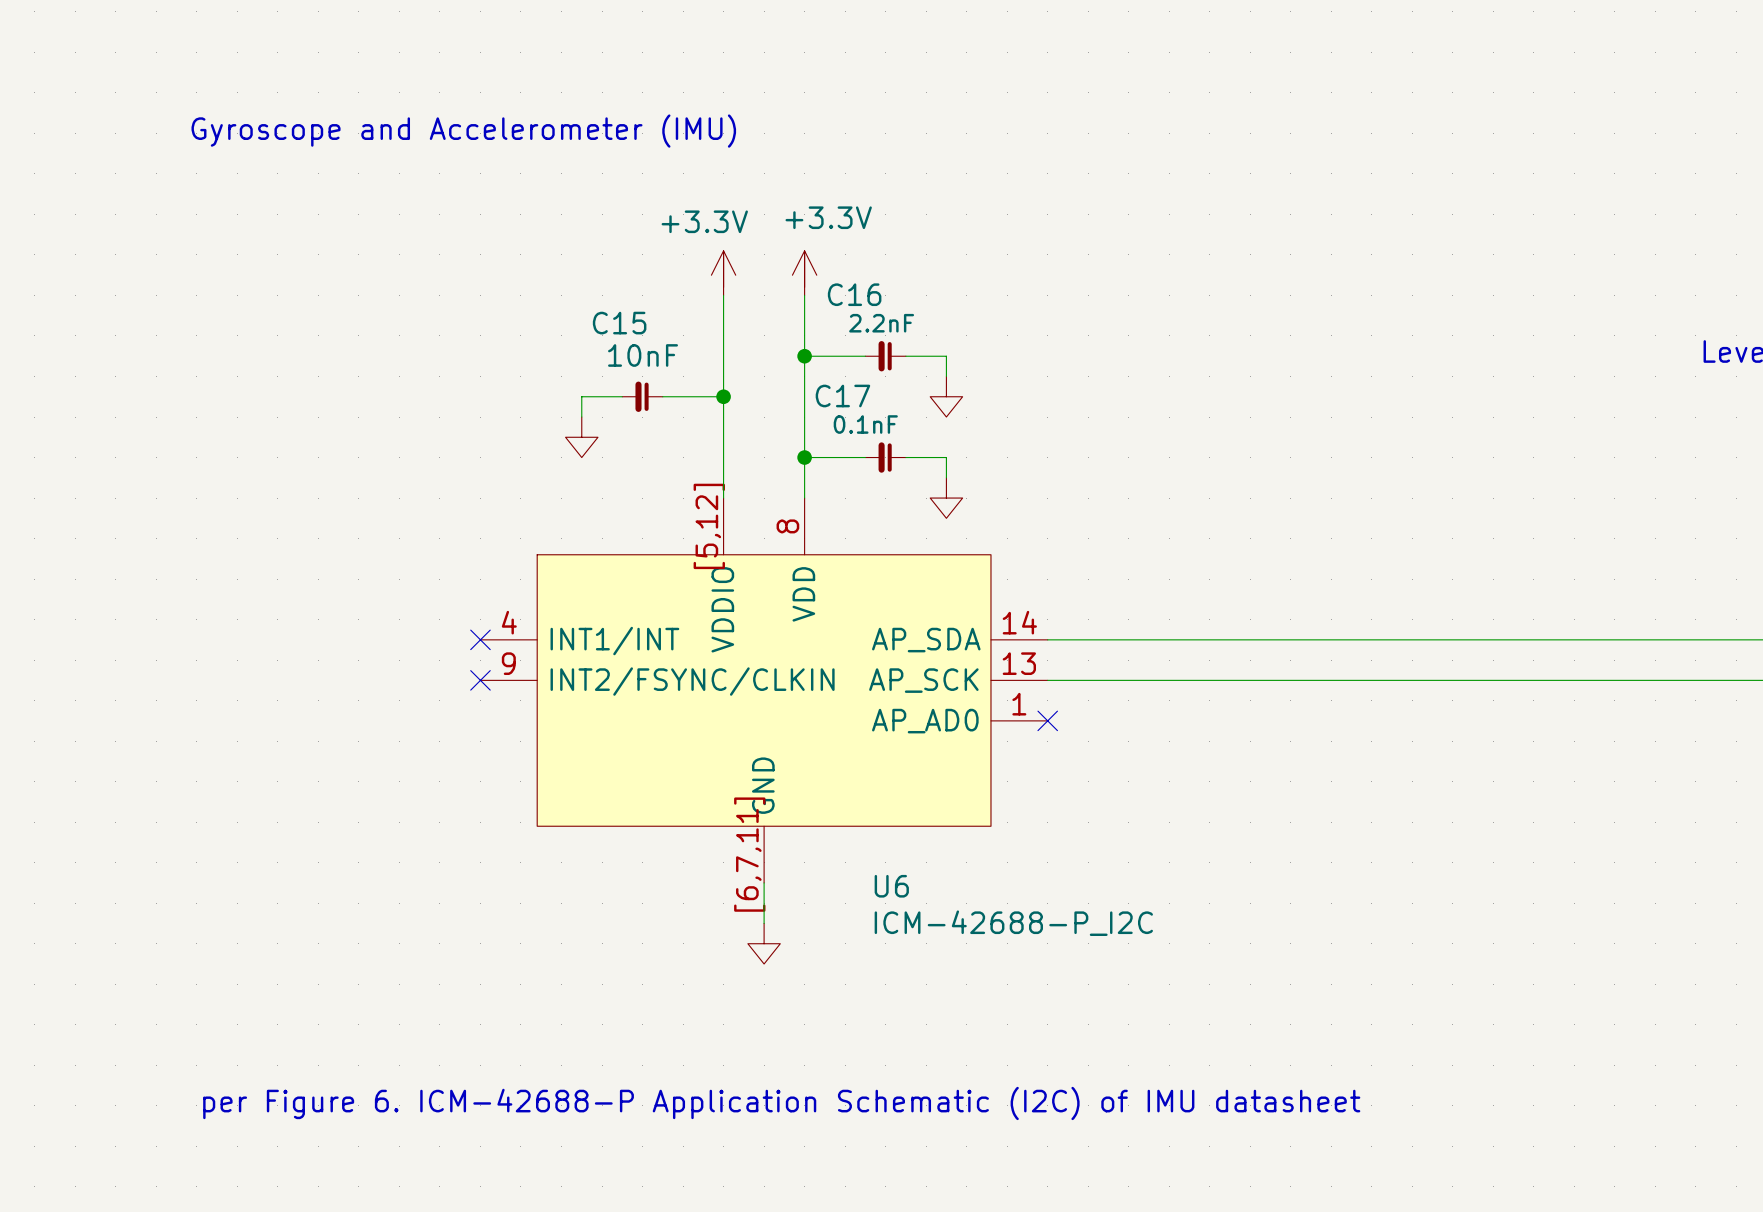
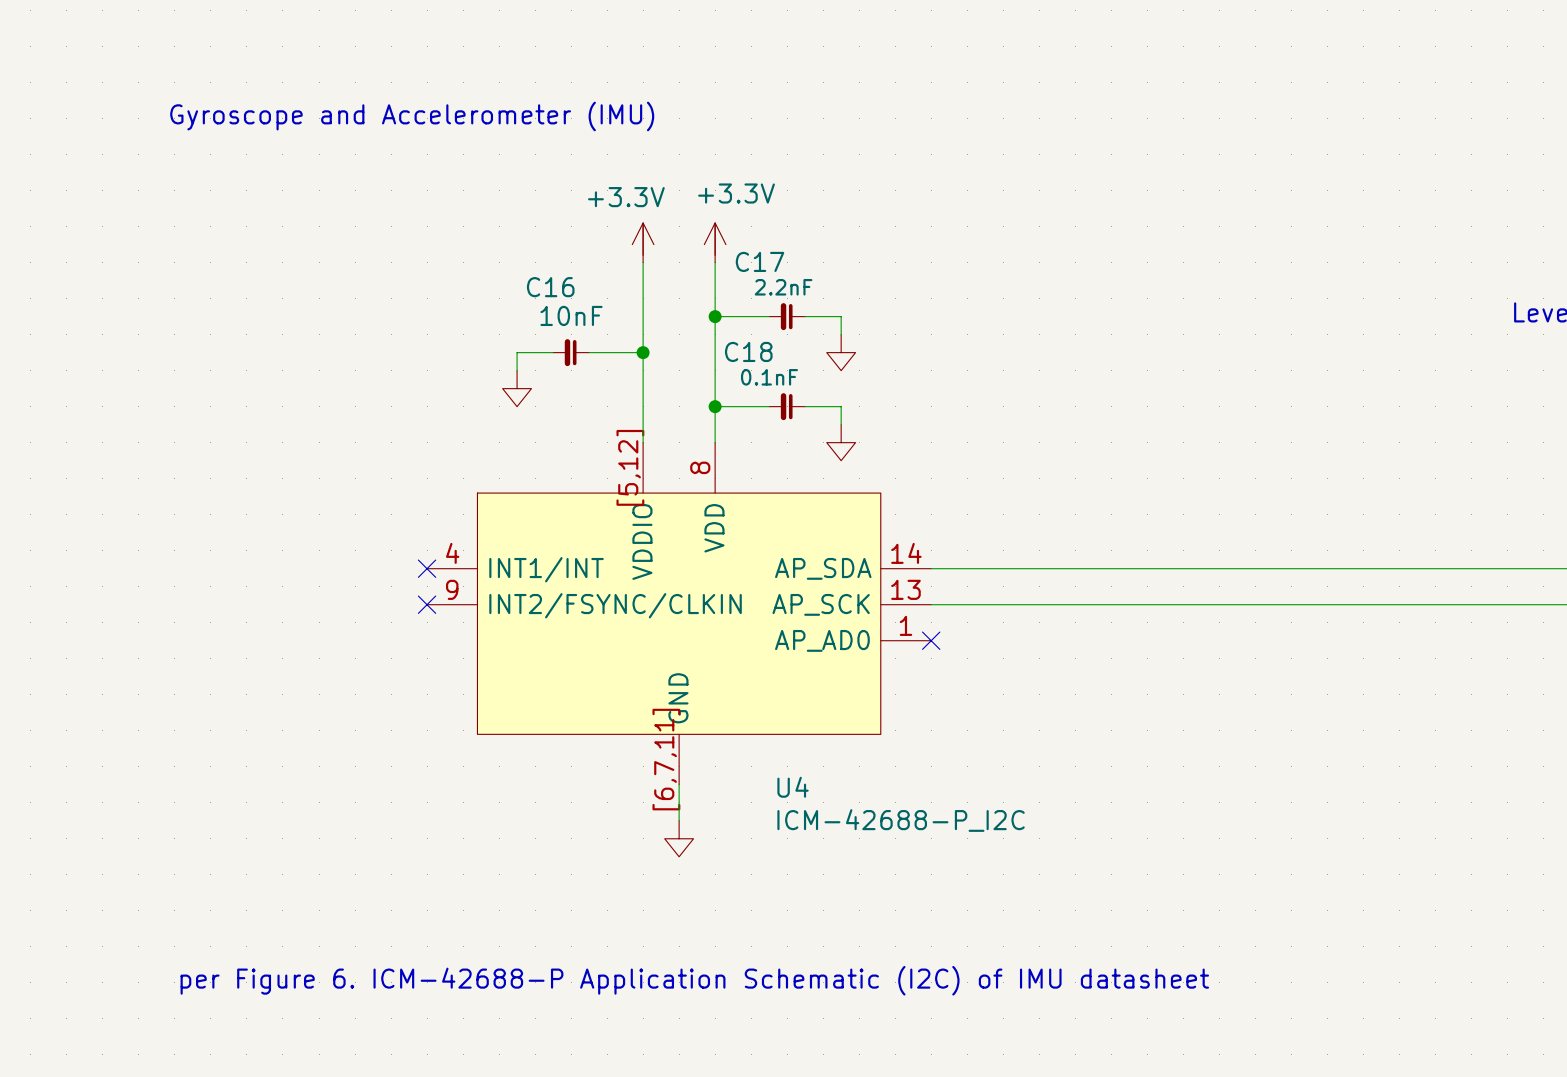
C16 name: C16 (854, 294) -> C17 (760, 261)
C15 name: C15 (619, 323) -> C16 (550, 287)
C17 name: C17 (842, 396) -> C18 (748, 351)
U6 name: U6 (891, 886) -> U4 (793, 787)

